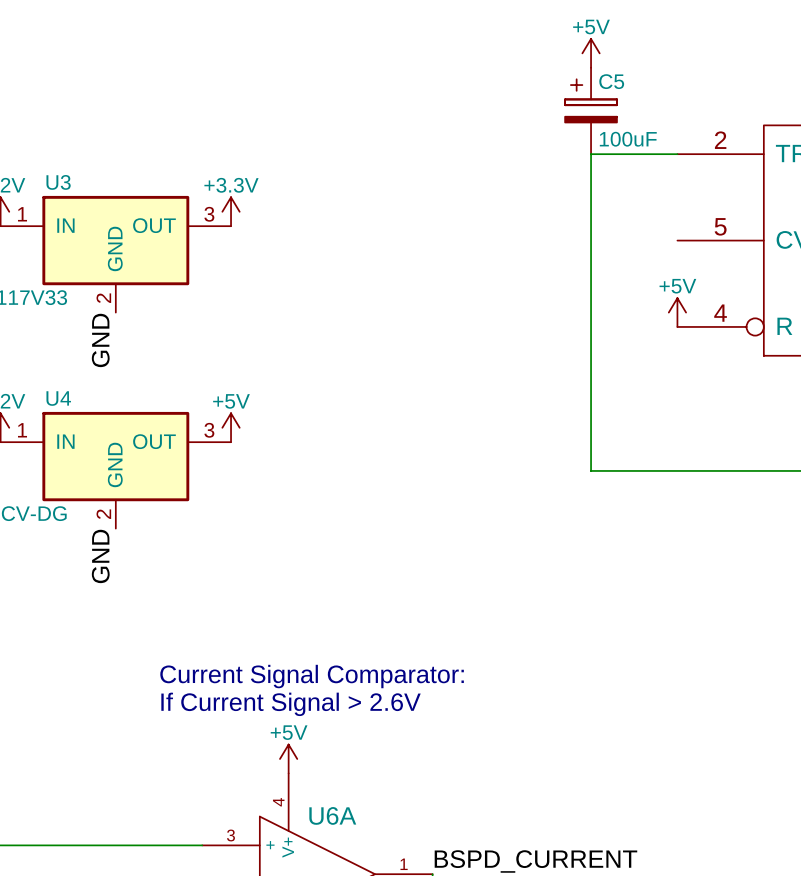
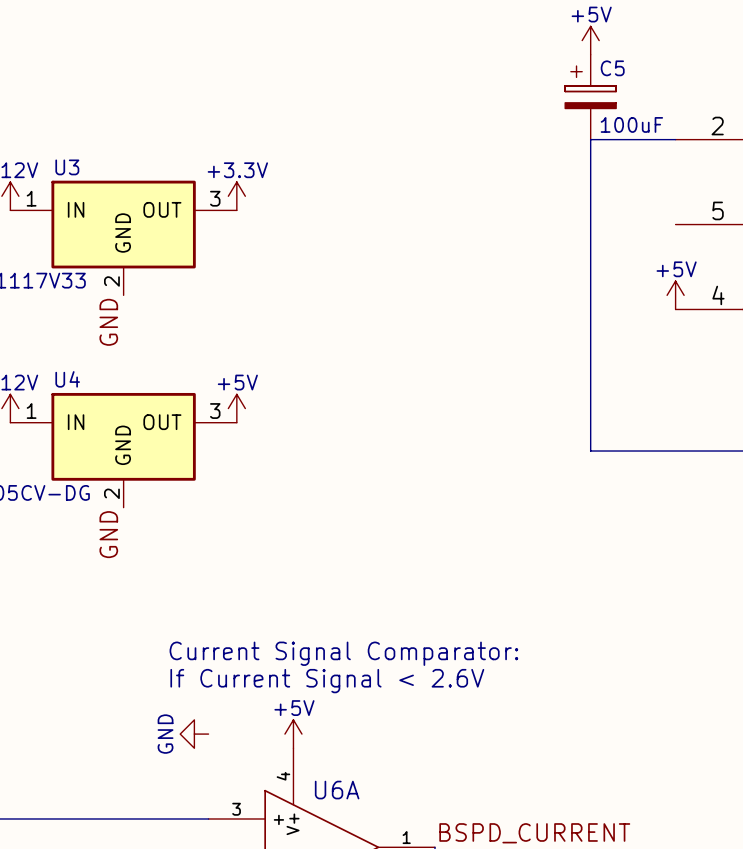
text: If Current Signal > 2.6V (291, 704) -> If Current Signal < 2.6V (327, 681)
power symbol: none -> GND (194, 734)

